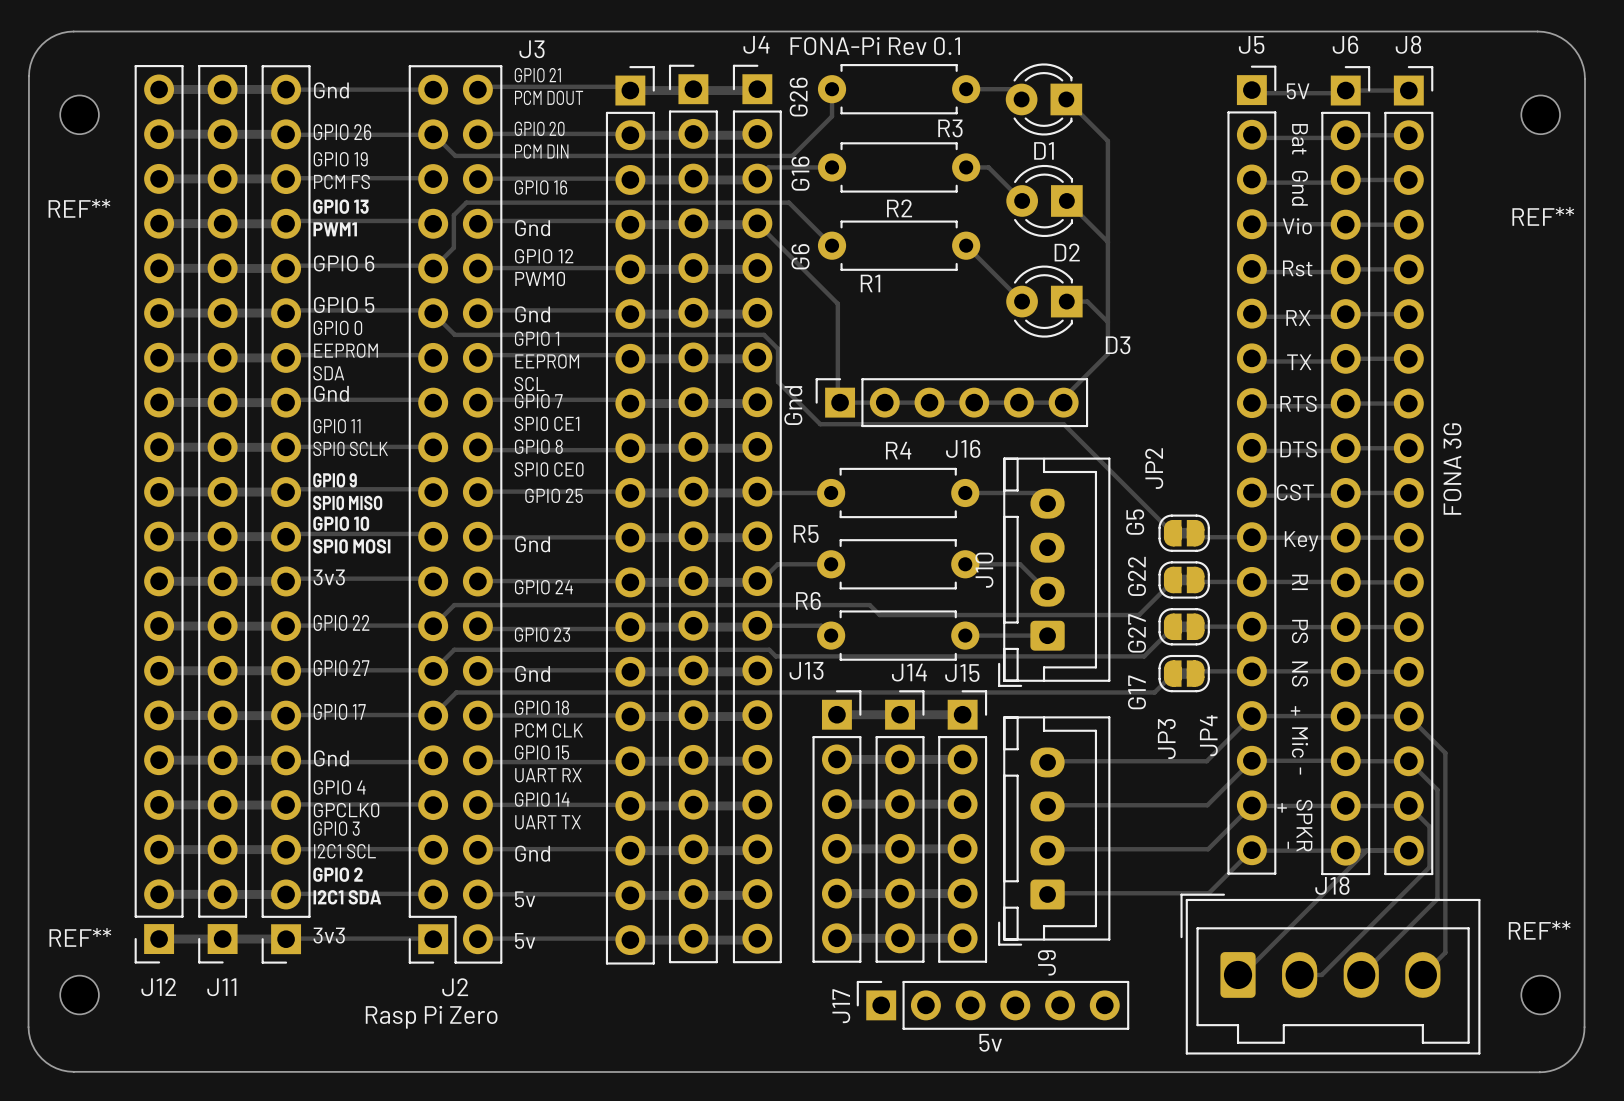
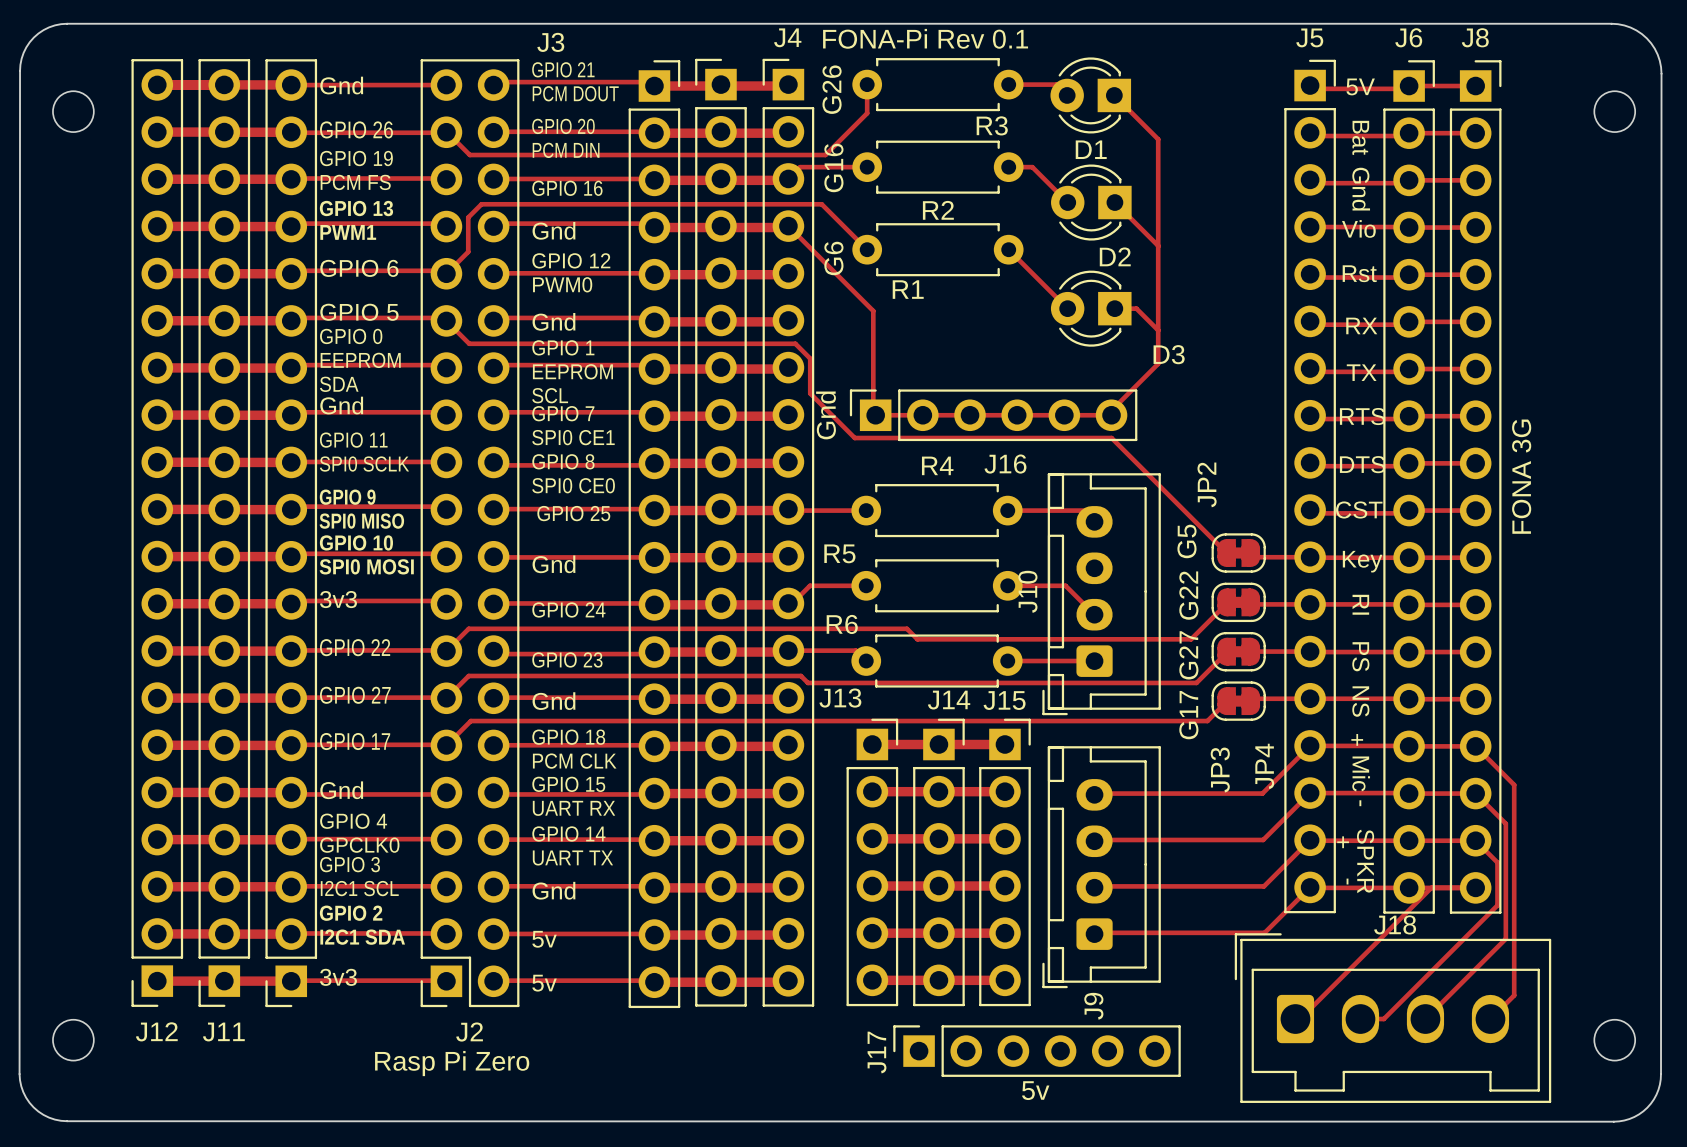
REF** name: REF** (79, 208) -> none
REF** name: REF** (1543, 216) -> none
REF** name: REF** (1539, 930) -> none
REF** name: REF** (80, 937) -> none

